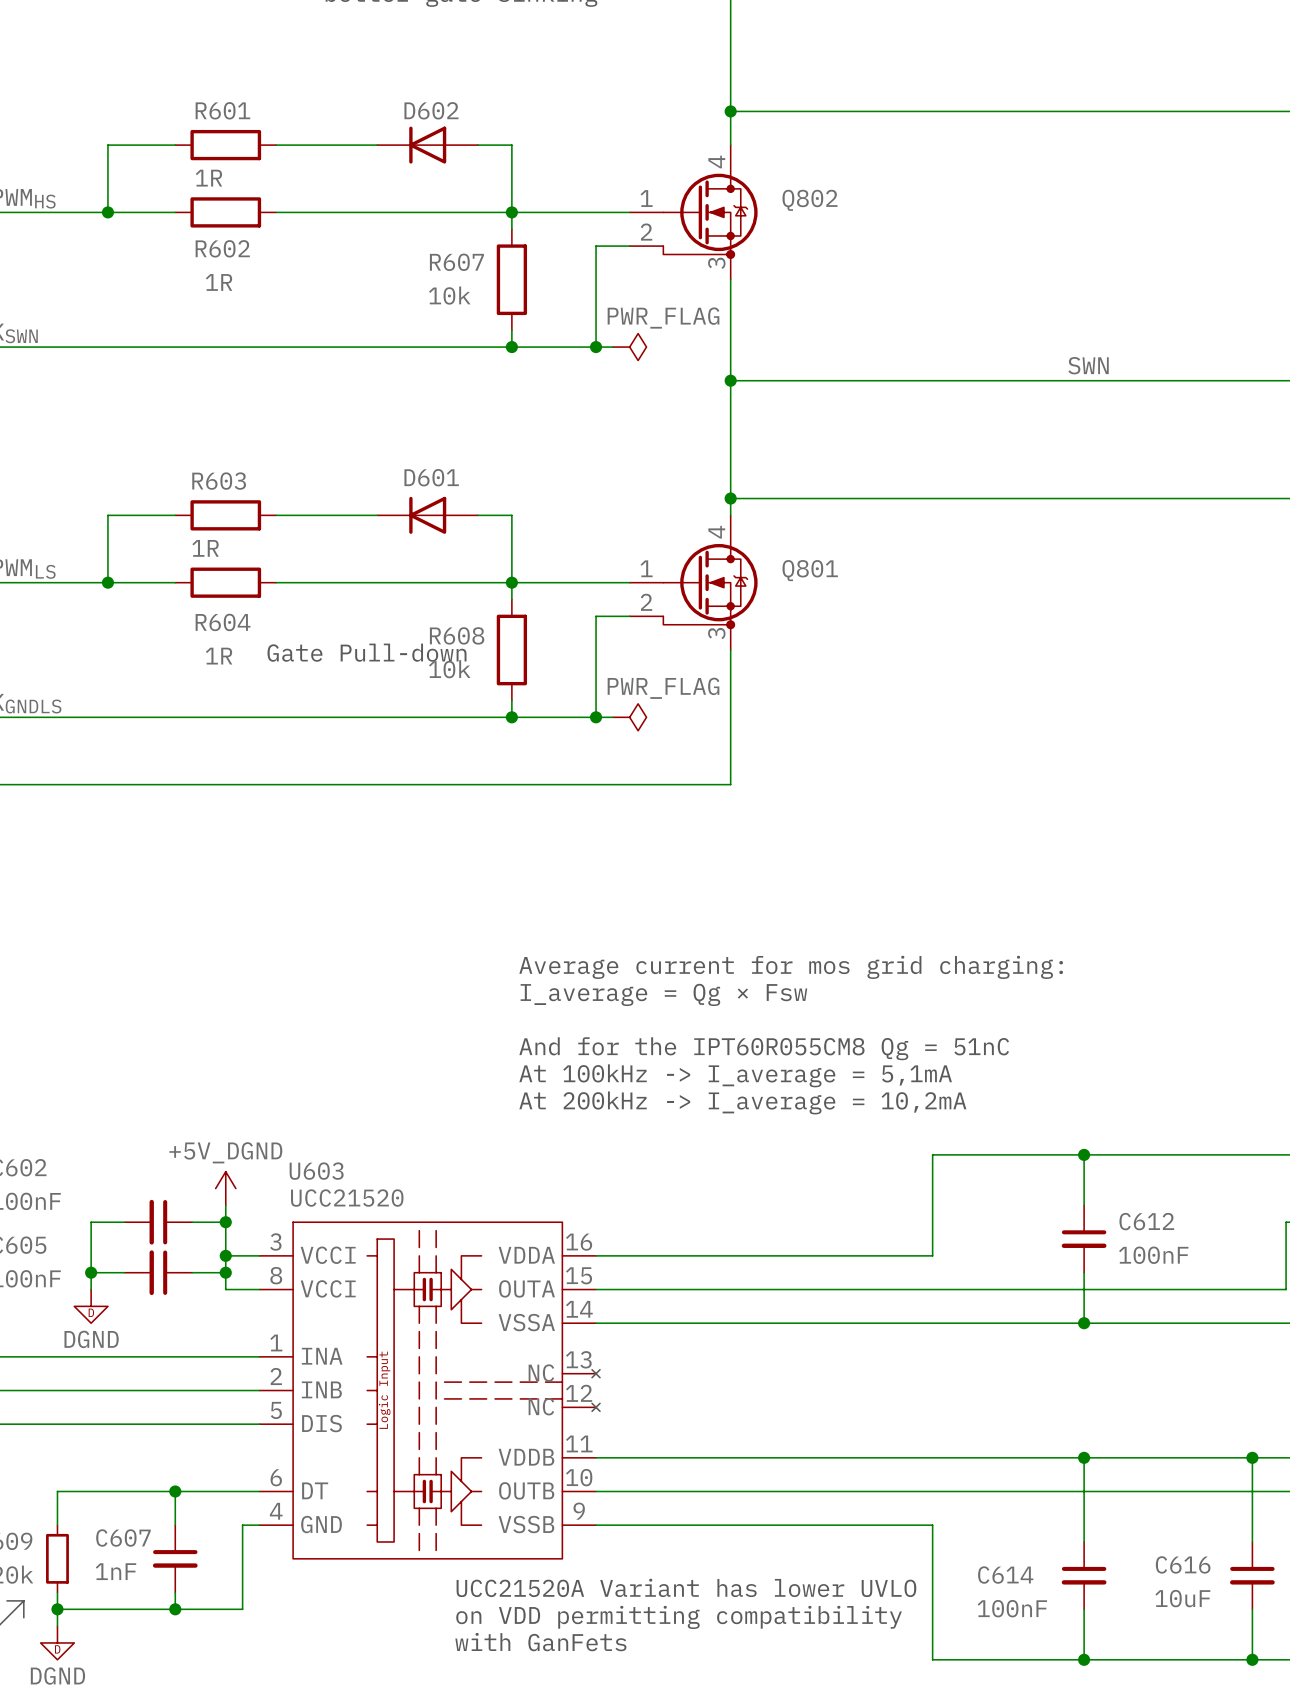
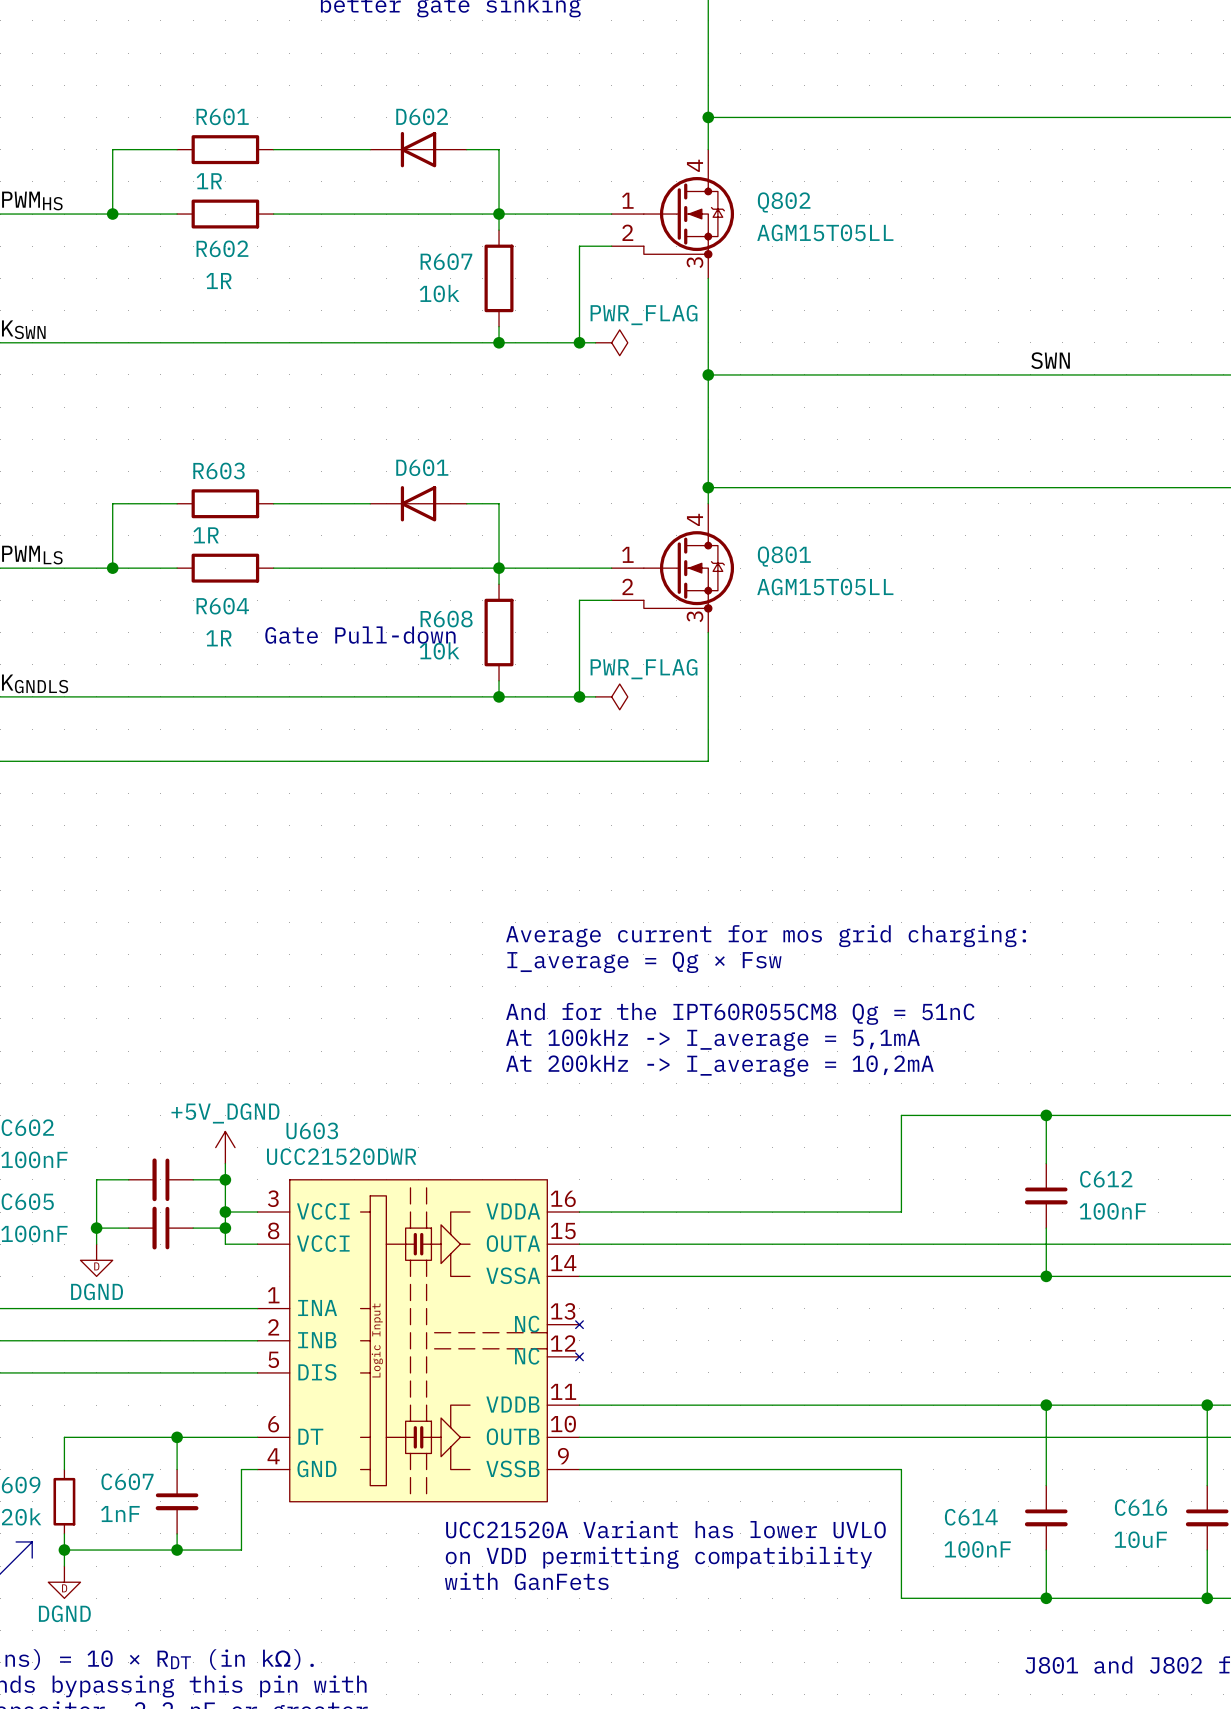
Q802 value: none -> AGM15T05LL (825, 232)
Q801 value: none -> AGM15T05LL (825, 587)
U603 value: UCC21520 (347, 1198) -> UCC21520DWR (341, 1156)

